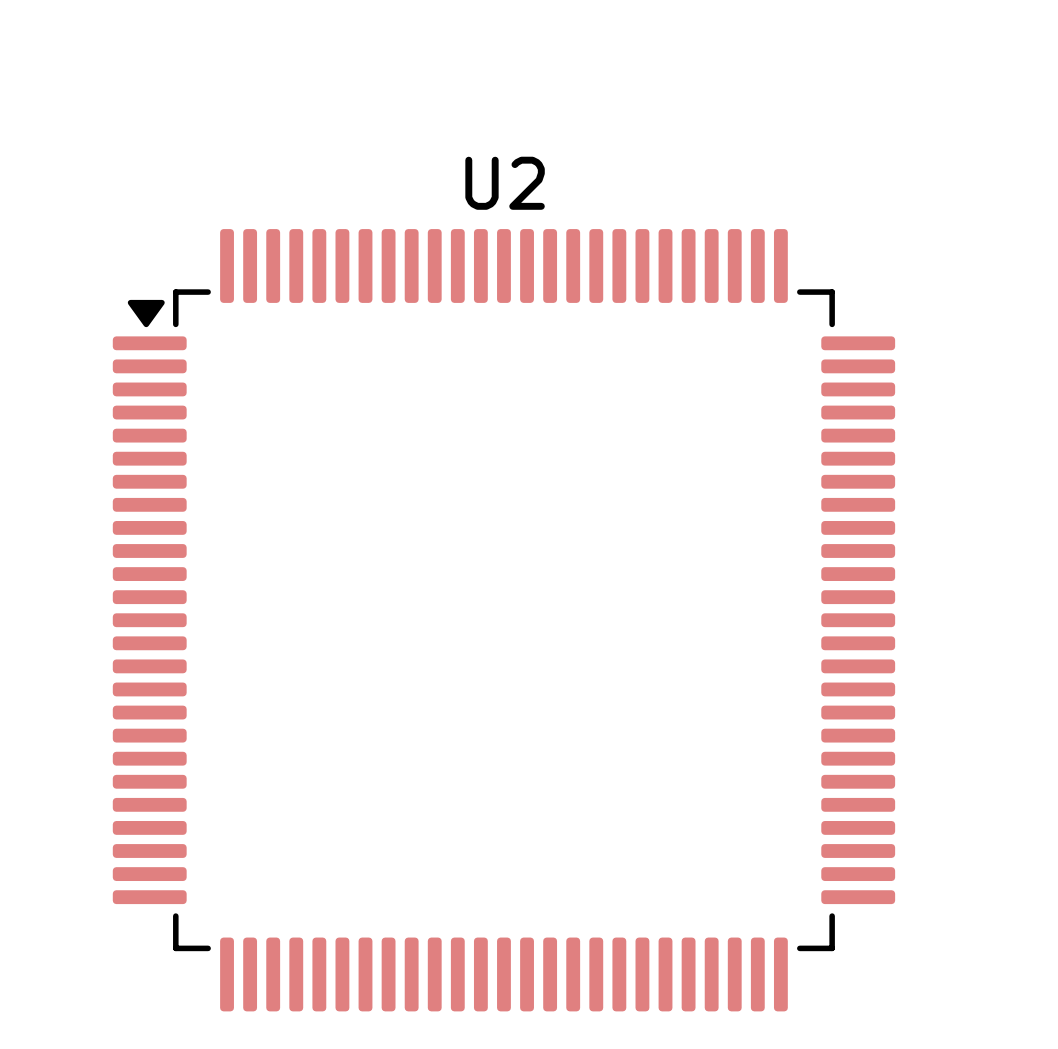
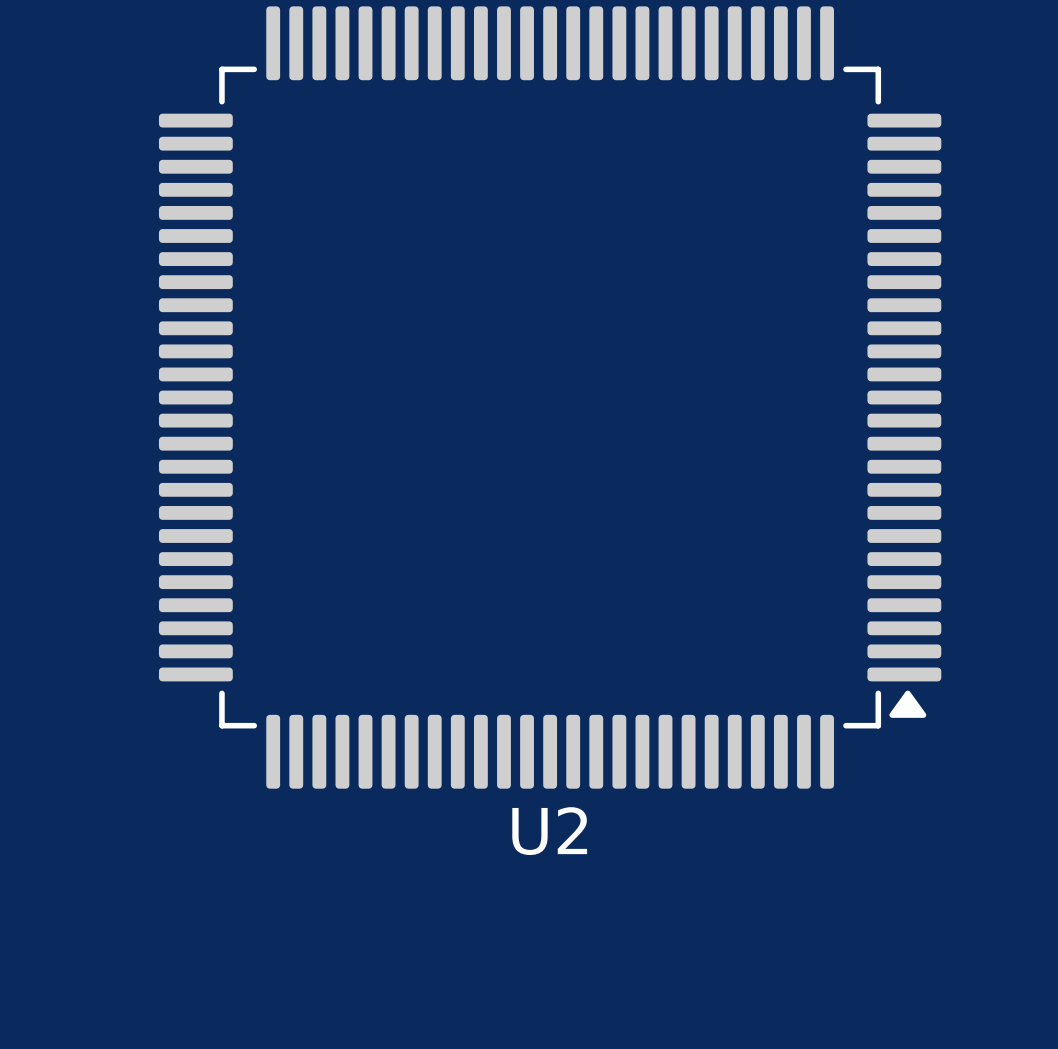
U2 rotation: 0° (503, 620) -> 180° (550, 397)

